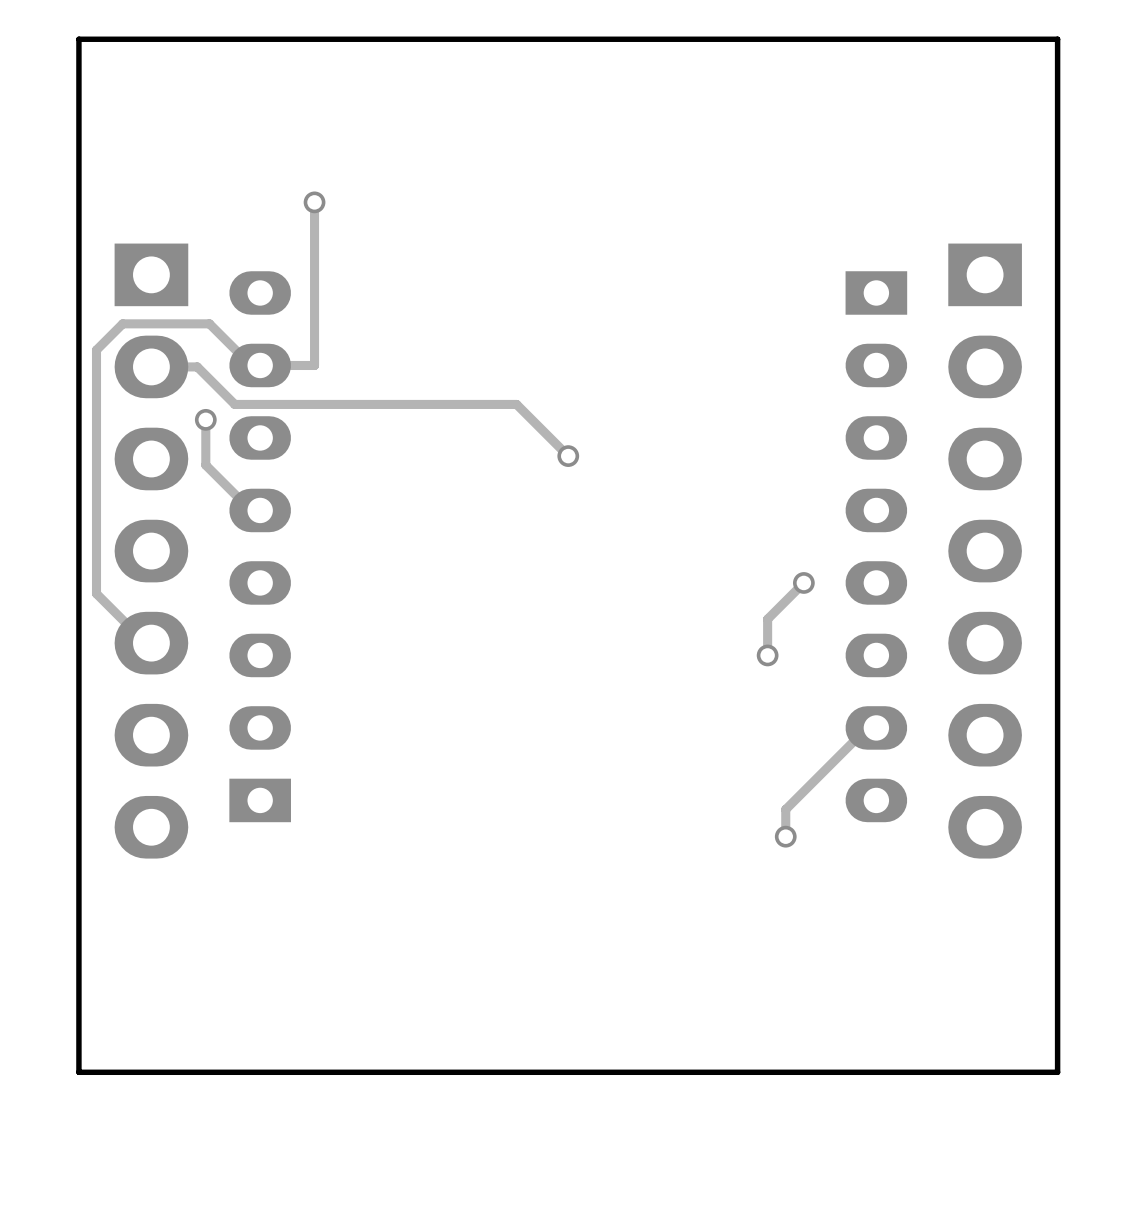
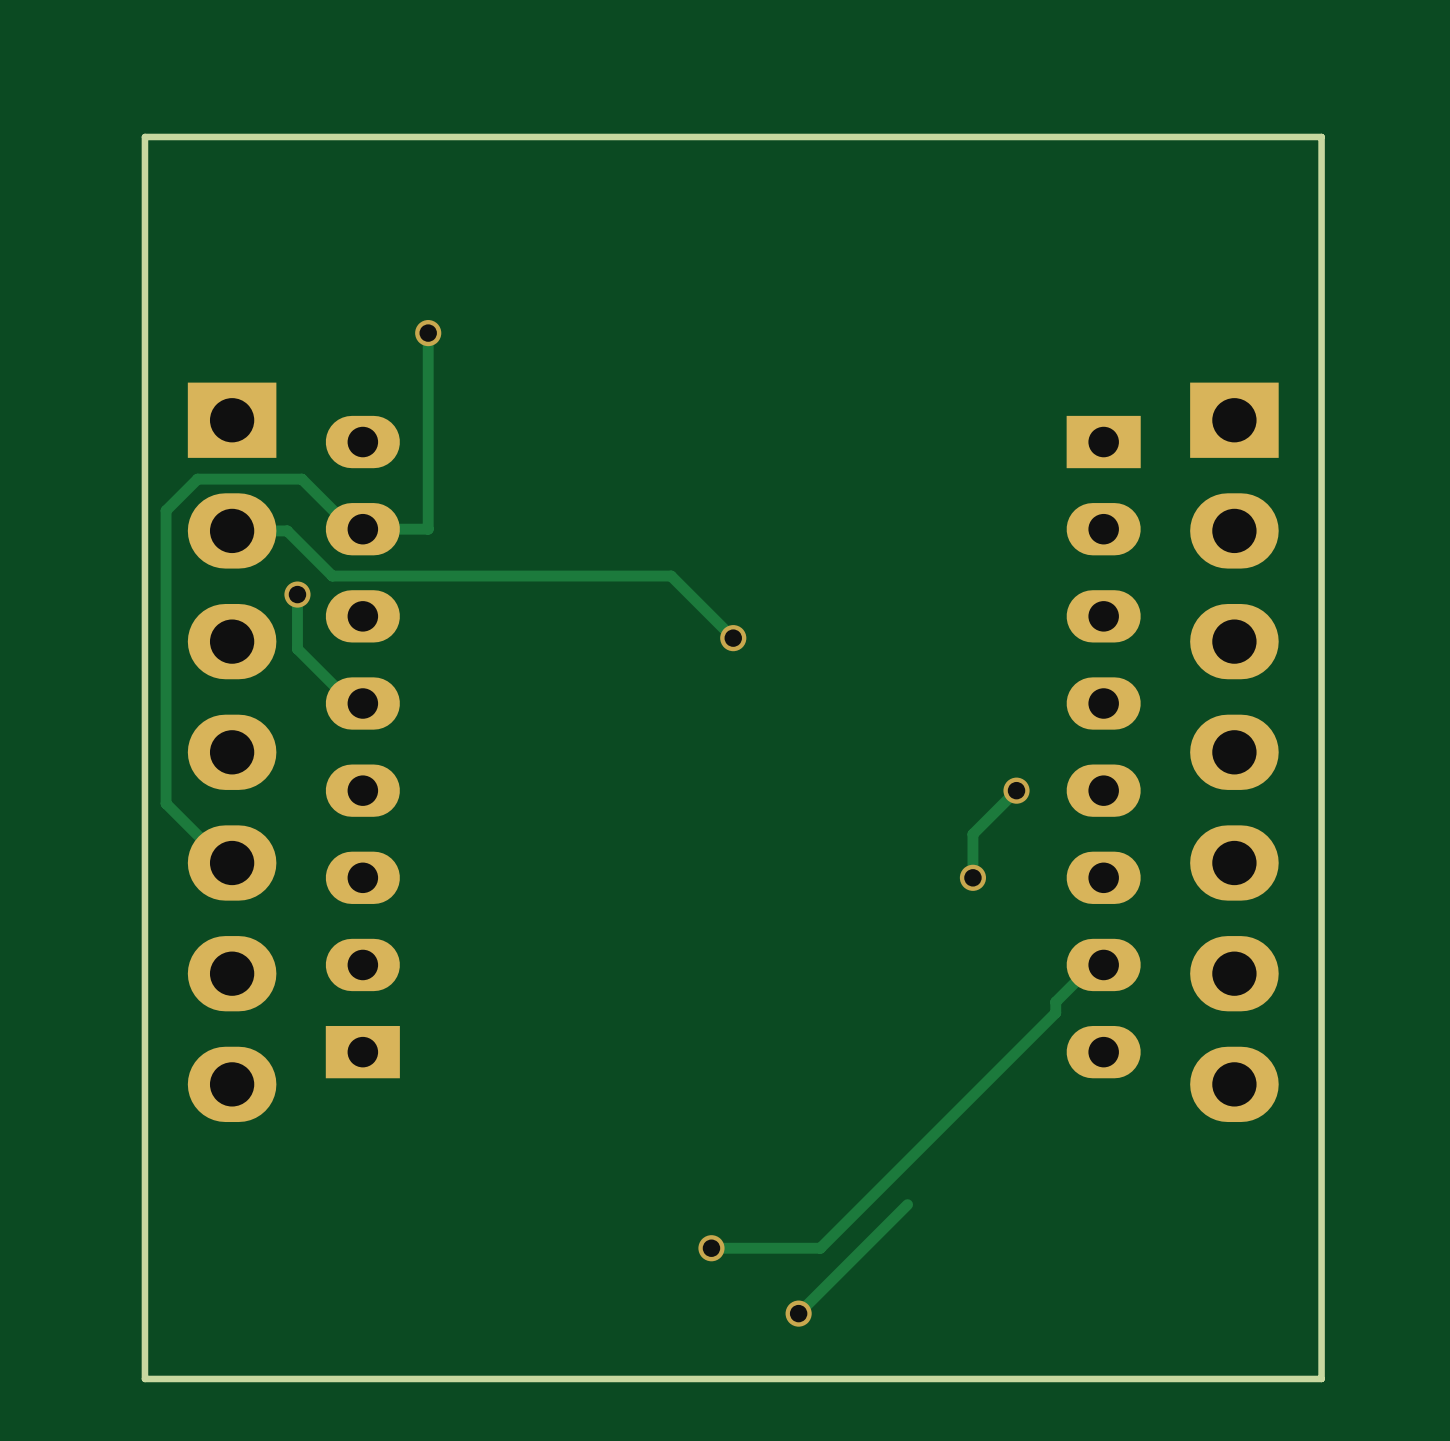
track: (836, 758) (785, 809) (785, 836) -> (1055, 1002) (1055, 1012) (820, 1248) (711, 1248)
via: (785, 836) -> none
track: none -> (907, 1204) (798, 1313)
via: none -> (711, 1248)
via: none -> (798, 1313)

